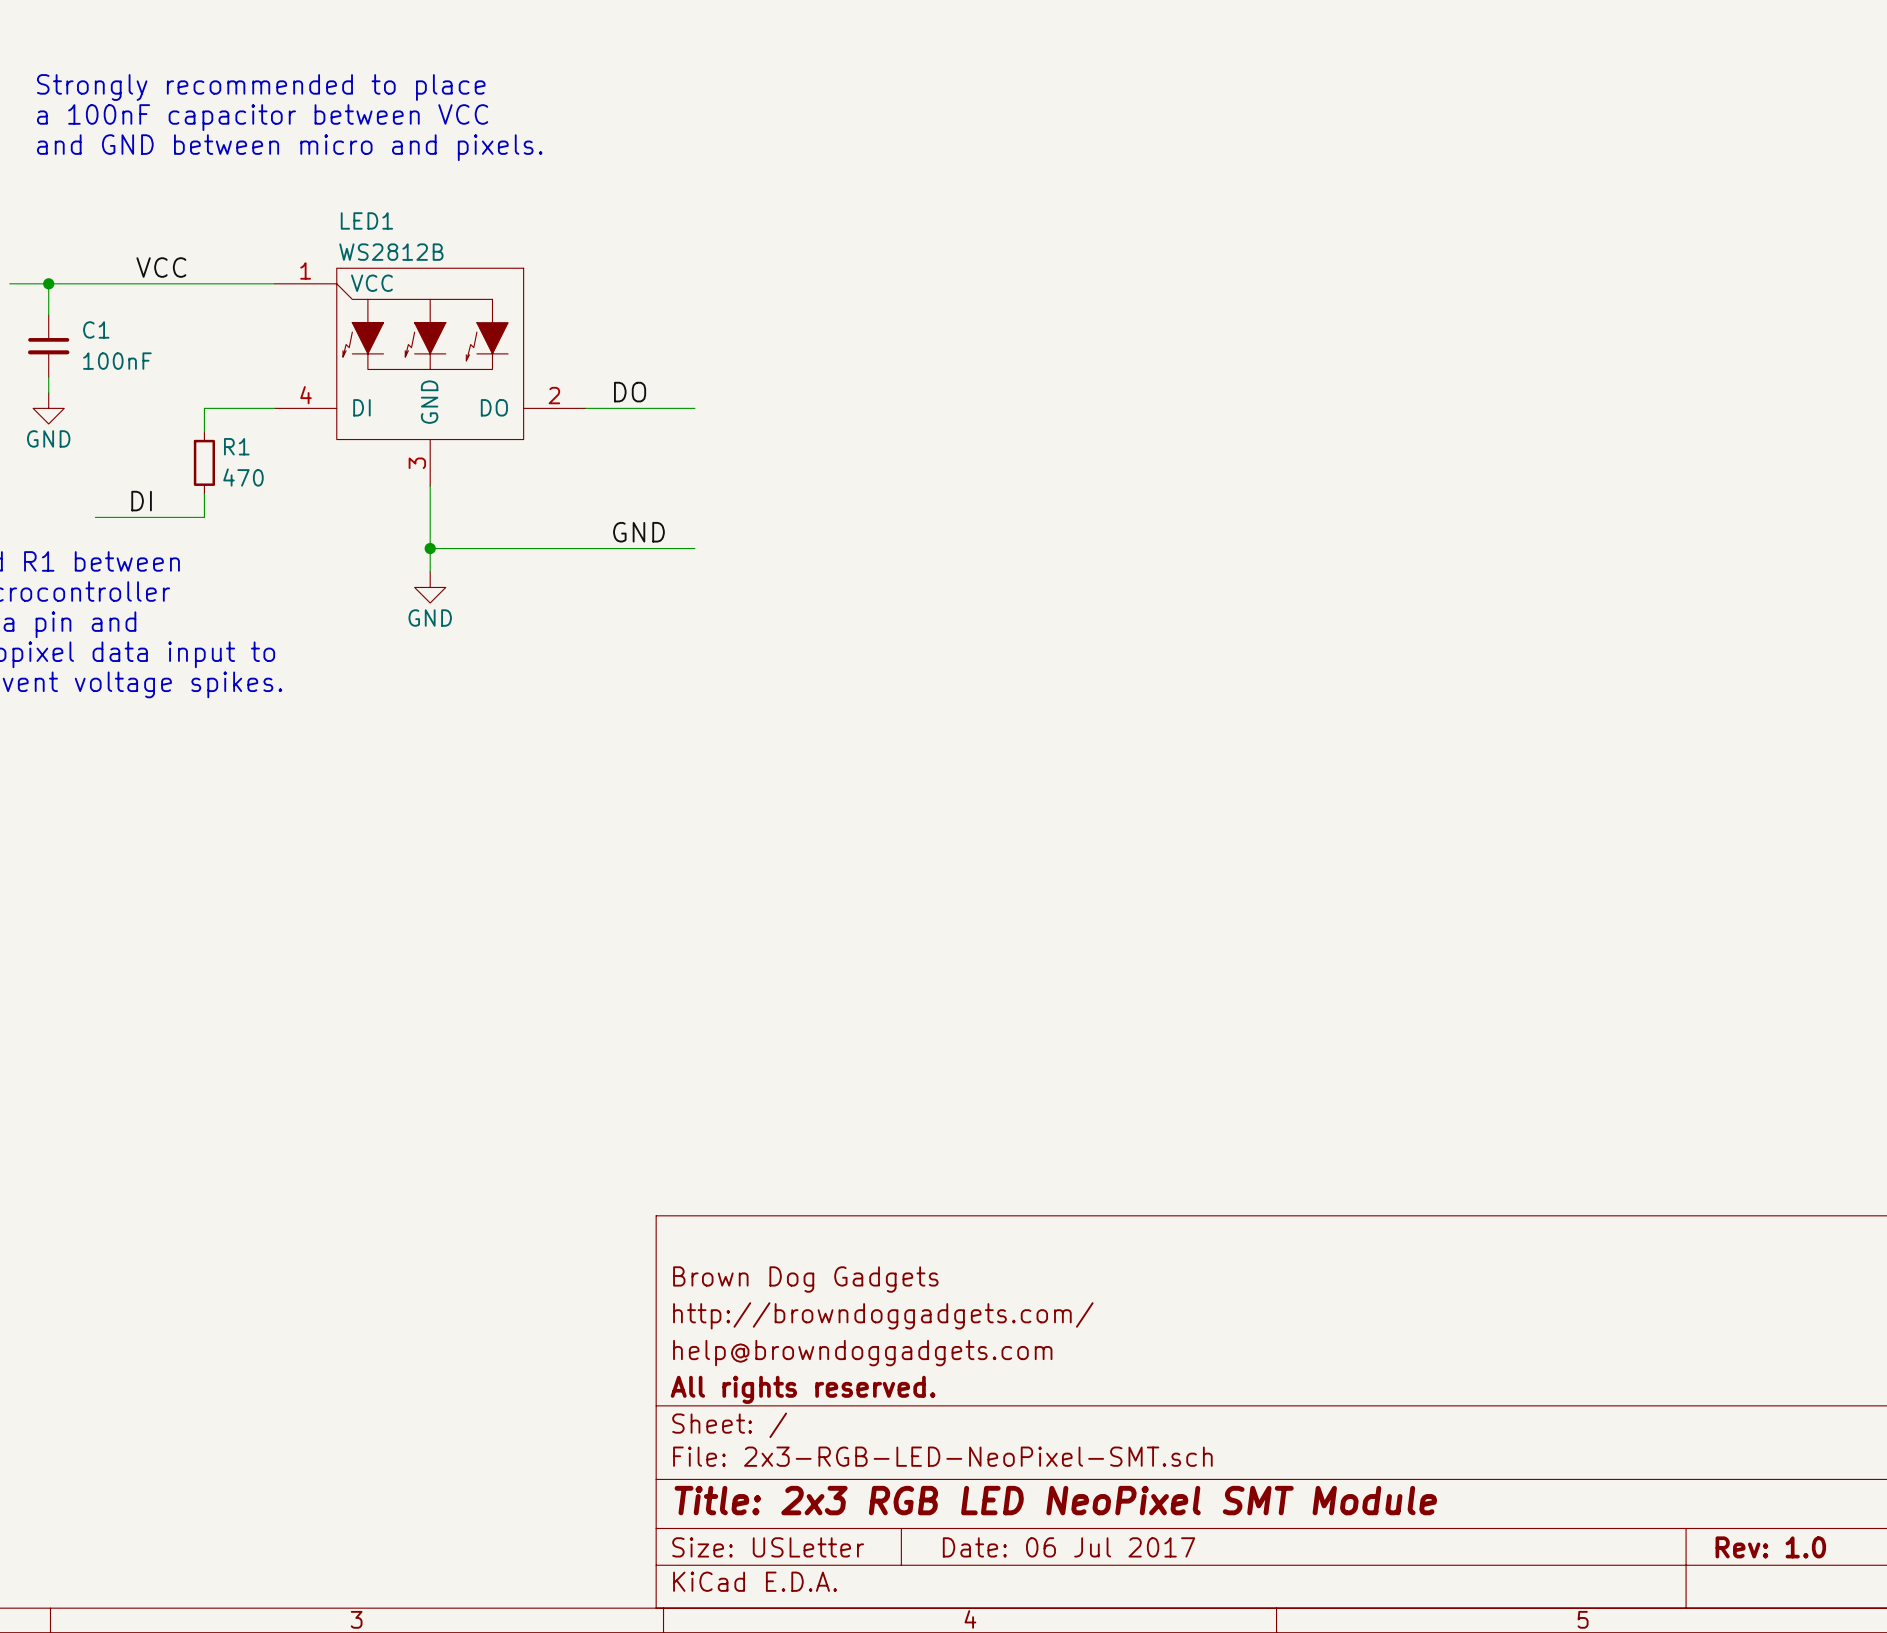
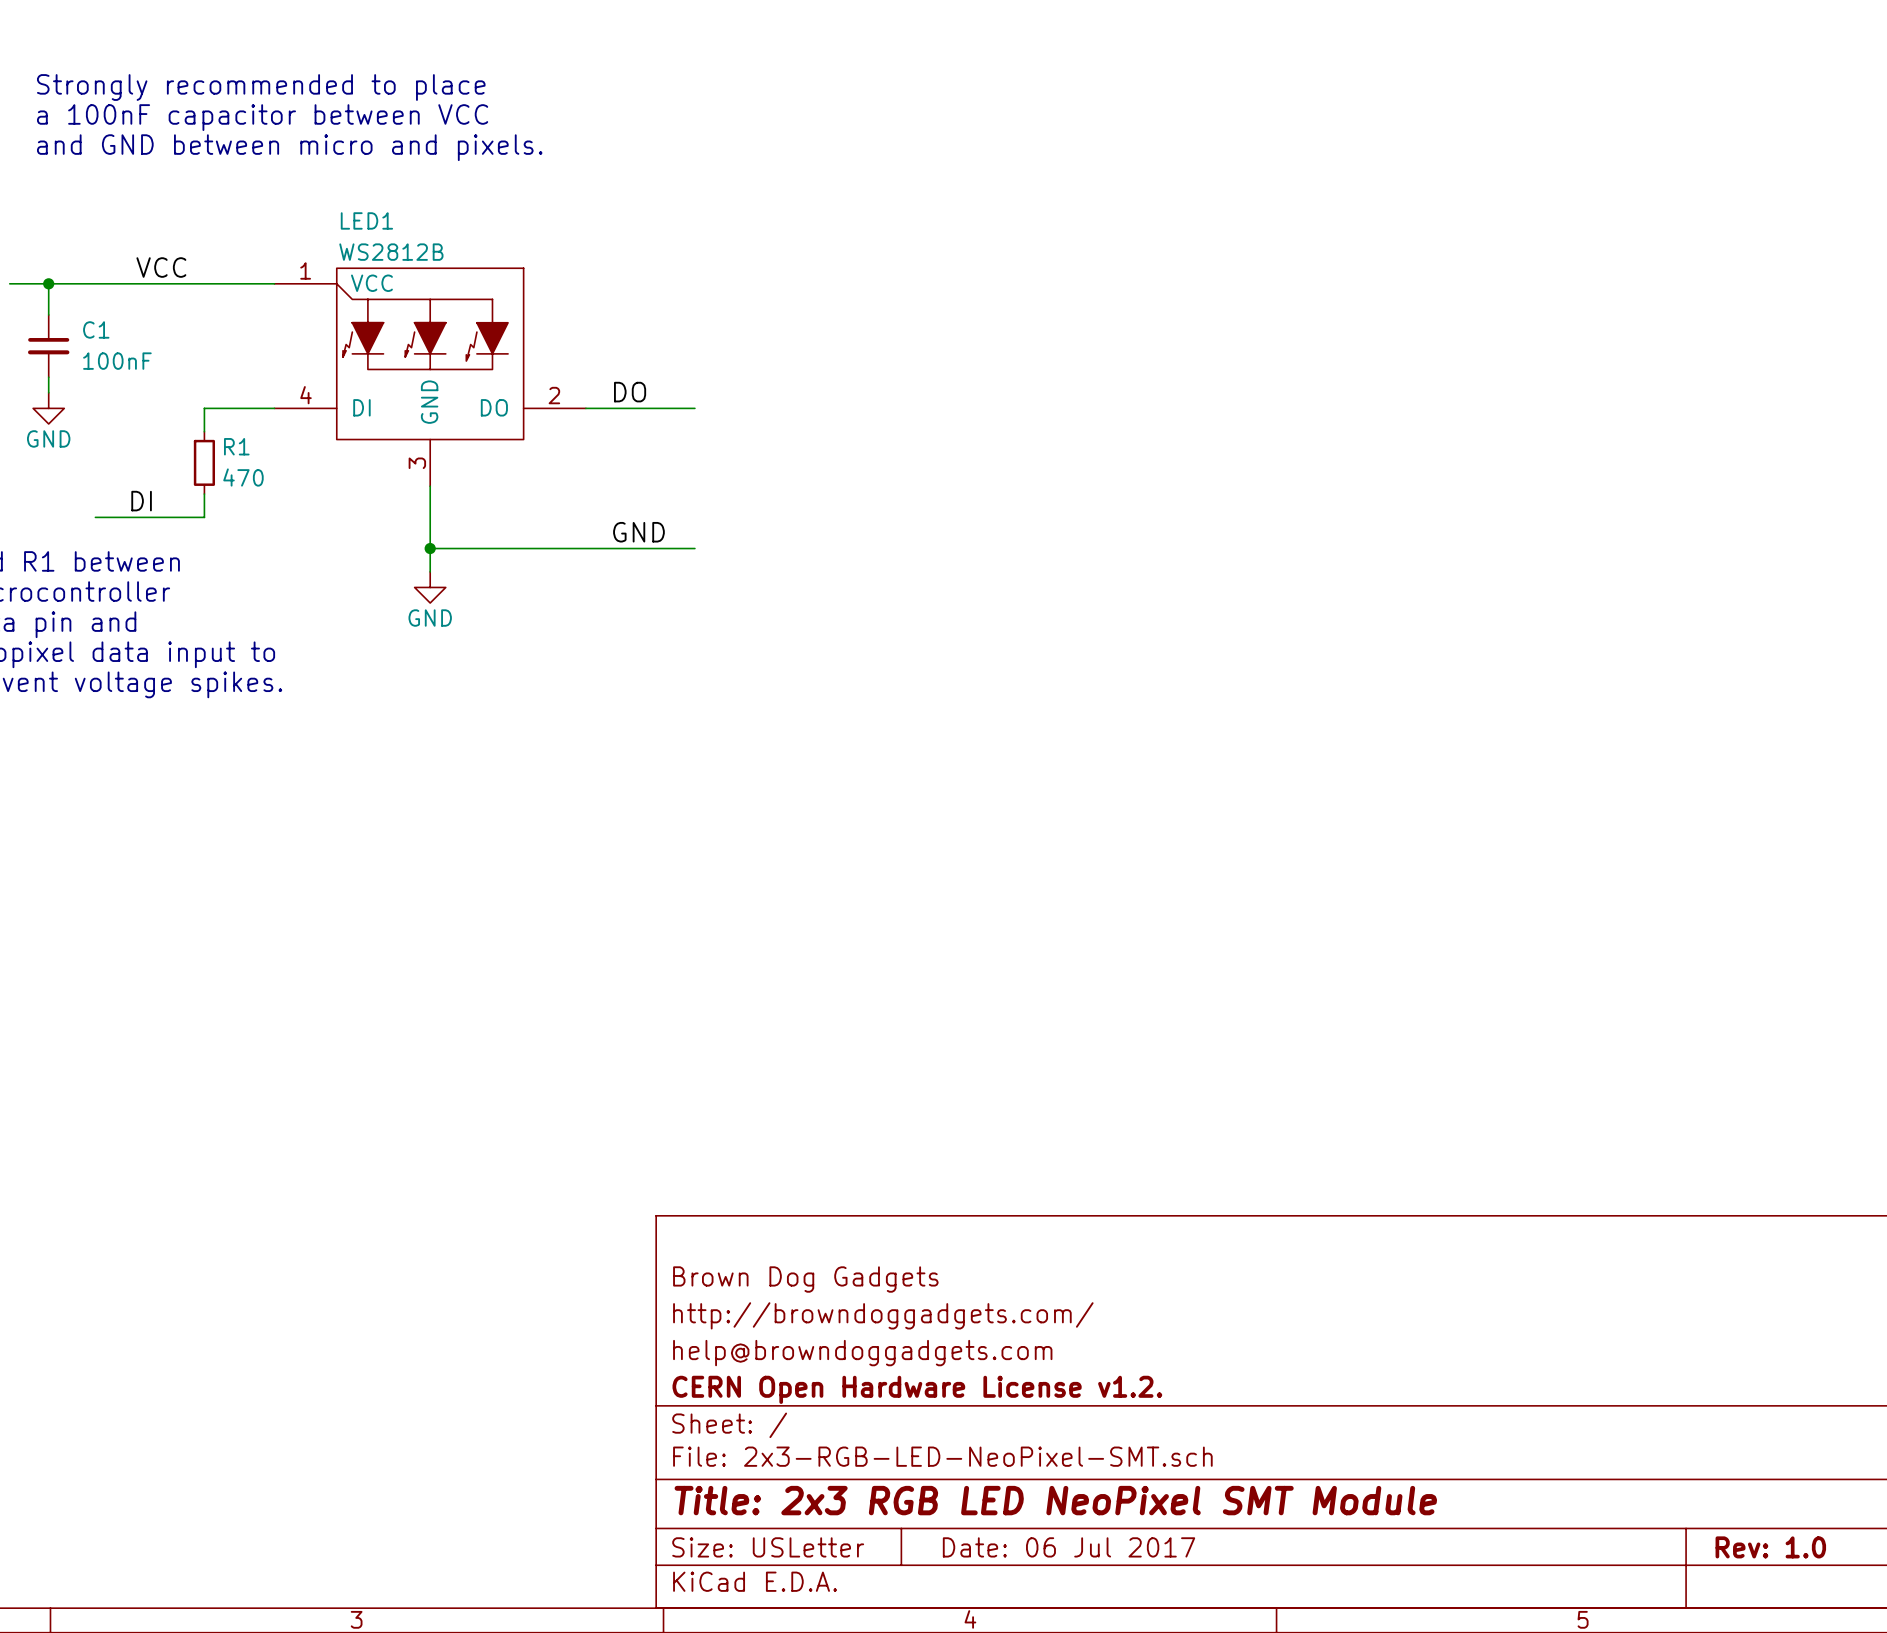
title block: All rights reserved. (803, 1389) -> CERN Open Hardware License v1.2. (917, 1389)

